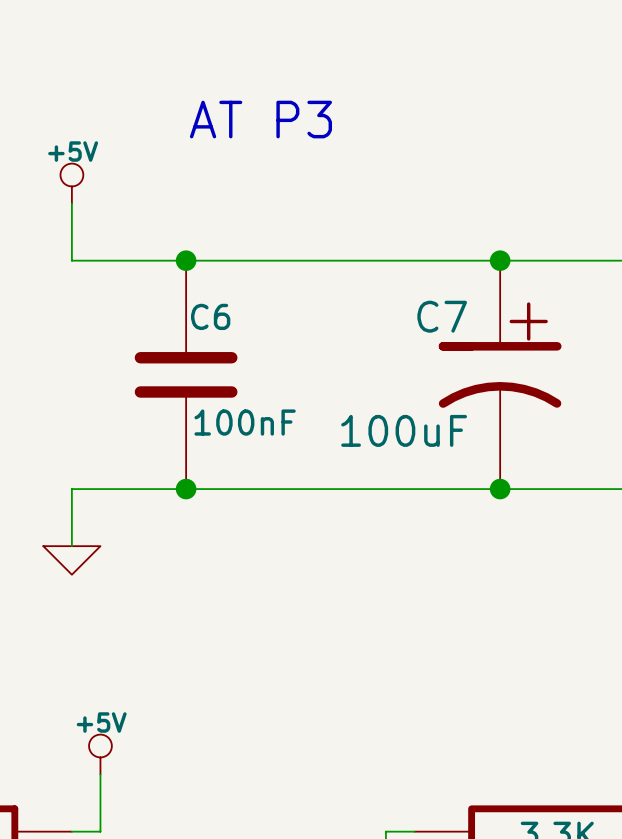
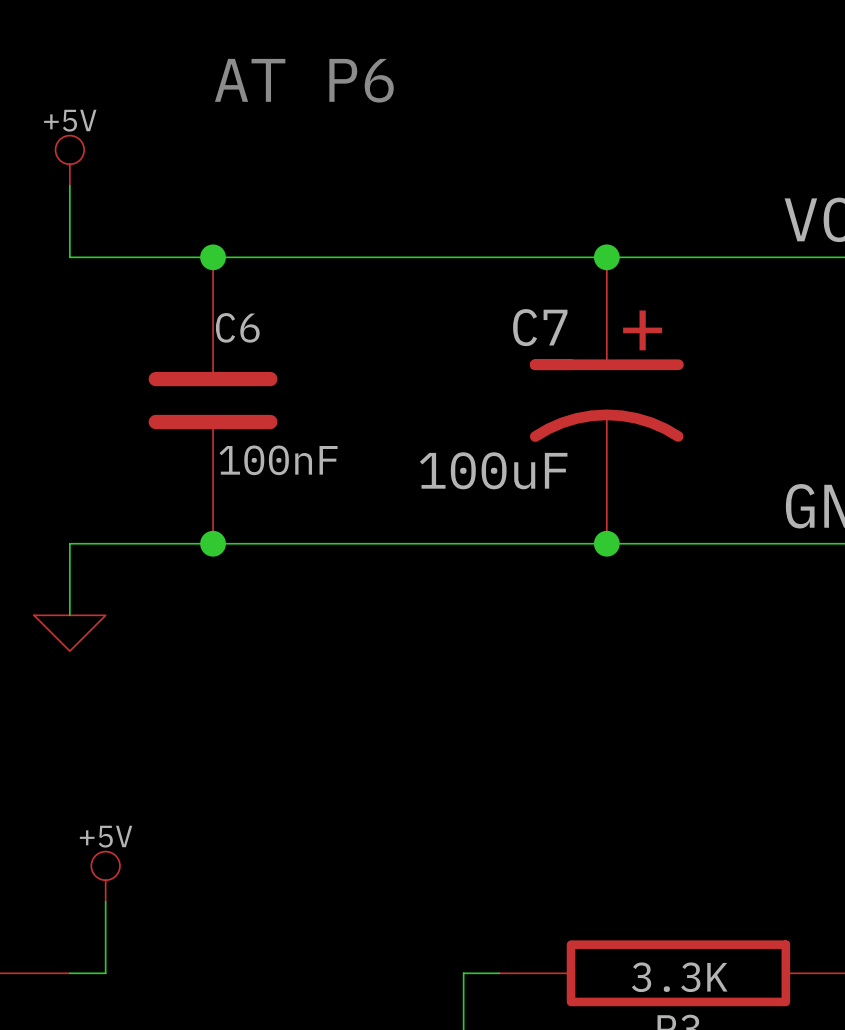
text: AT P3 (260, 119) -> AT P6 (304, 80)

